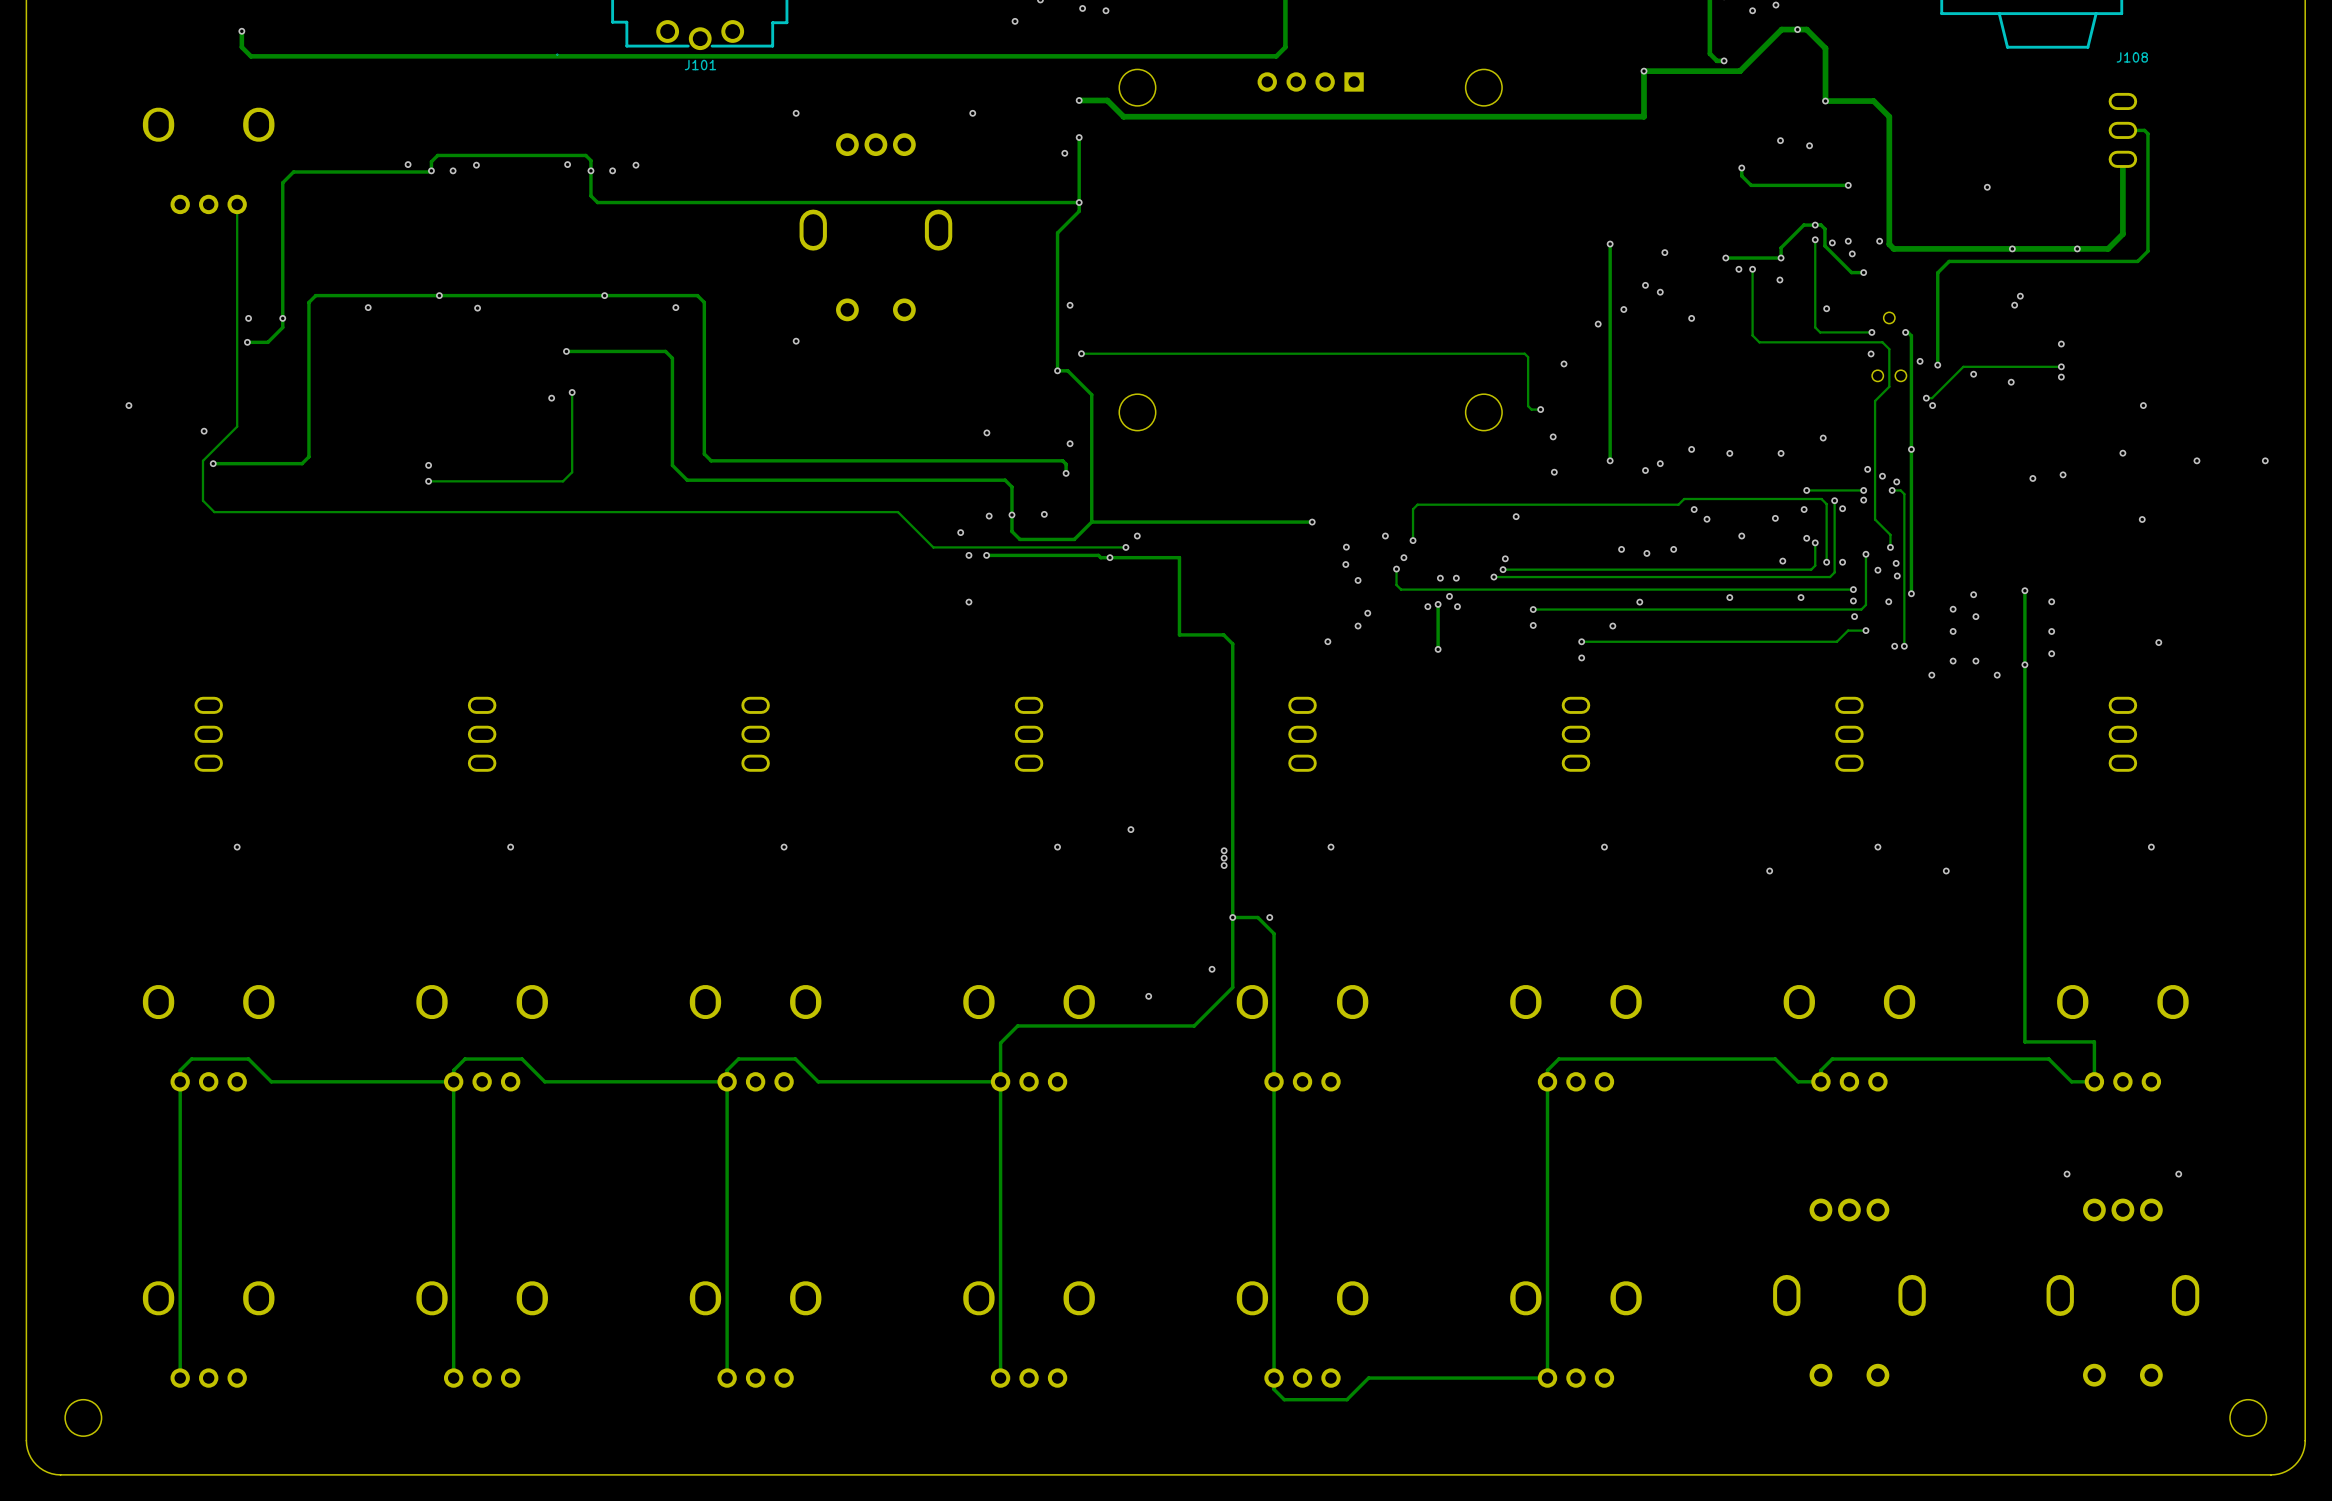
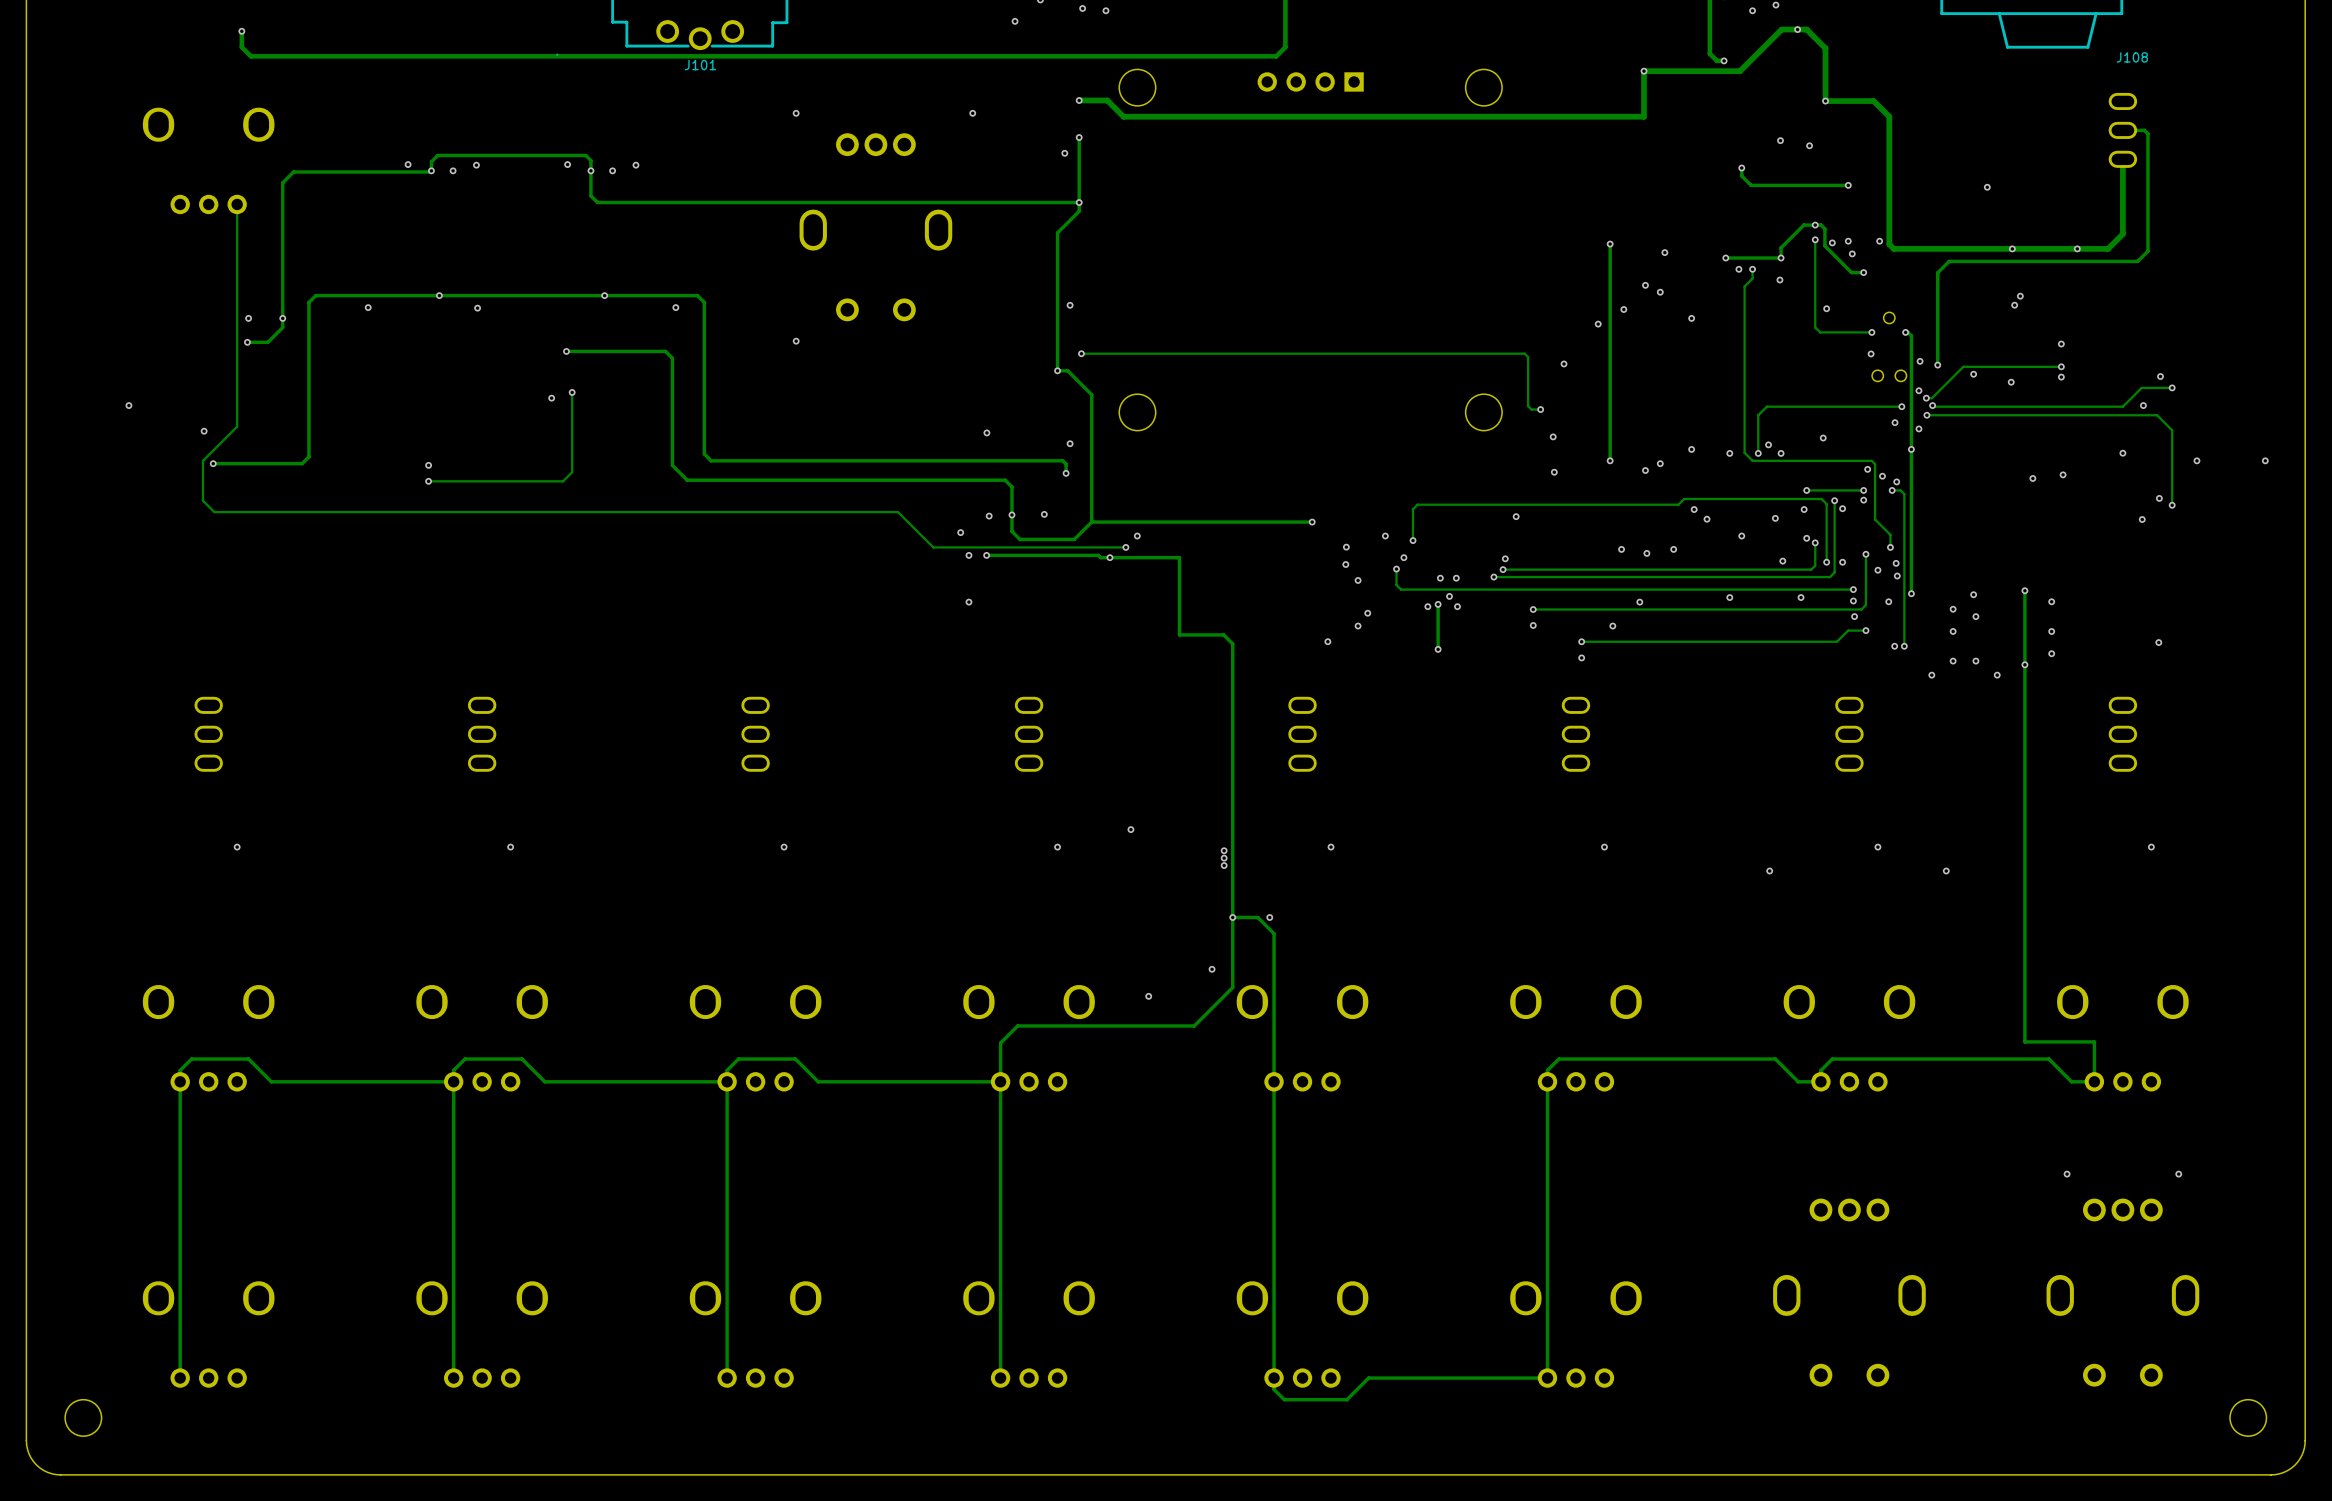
track: (1752, 278) (1752, 335) (1759, 342) (1882, 342) (1889, 349) (1889, 386) (1875, 401) (1875, 464) -> (1752, 278) (1744, 286) (1744, 452) (1752, 460) (1871, 460) (1875, 464)
via: none -> (2160, 376)
track: none -> (2172, 387) (2141, 387) (2122, 406) (1933, 406)
via: none -> (2172, 387)
via: none -> (1918, 390)
track: none -> (1901, 406) (1766, 406) (1758, 415) (1758, 453)
via: none -> (1901, 406)
track: none -> (1926, 415) (2157, 415) (2172, 430) (2172, 505)
via: none -> (1926, 415)
via: none -> (1895, 422)
via: none -> (1918, 428)
via: none -> (1768, 444)
via: none -> (1758, 453)
via: none -> (2159, 498)
via: none -> (2172, 505)

